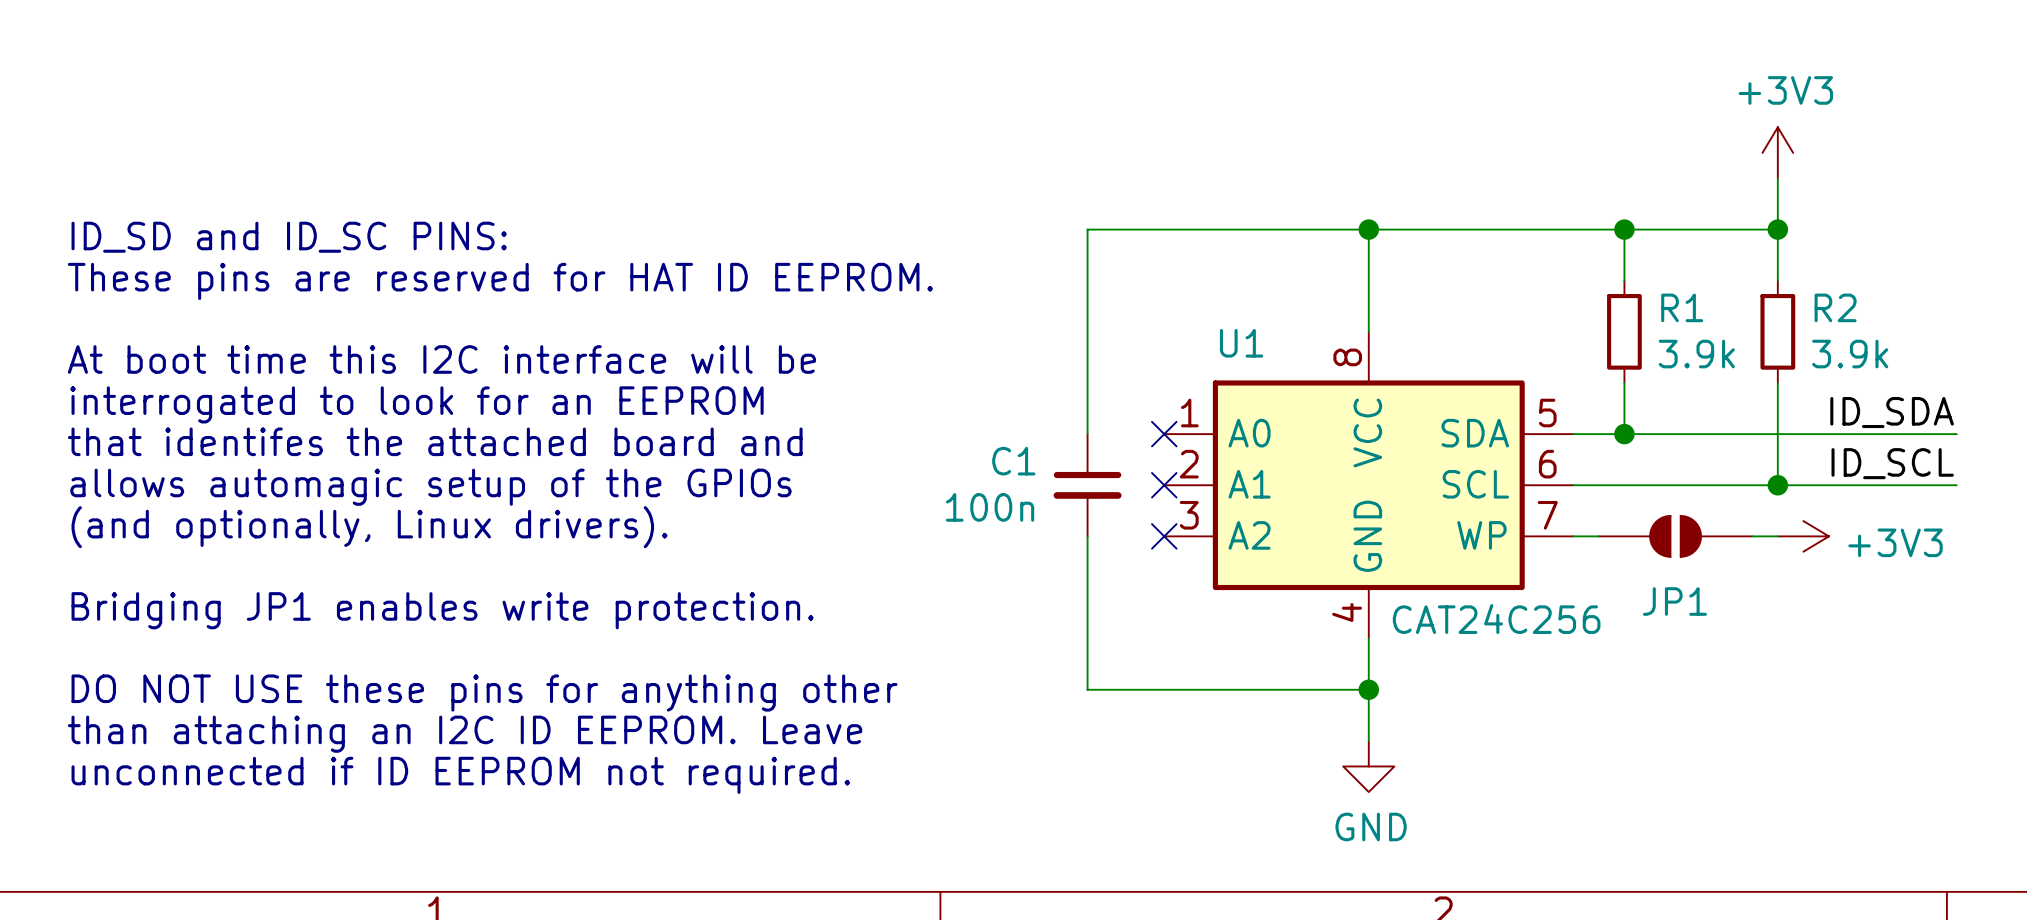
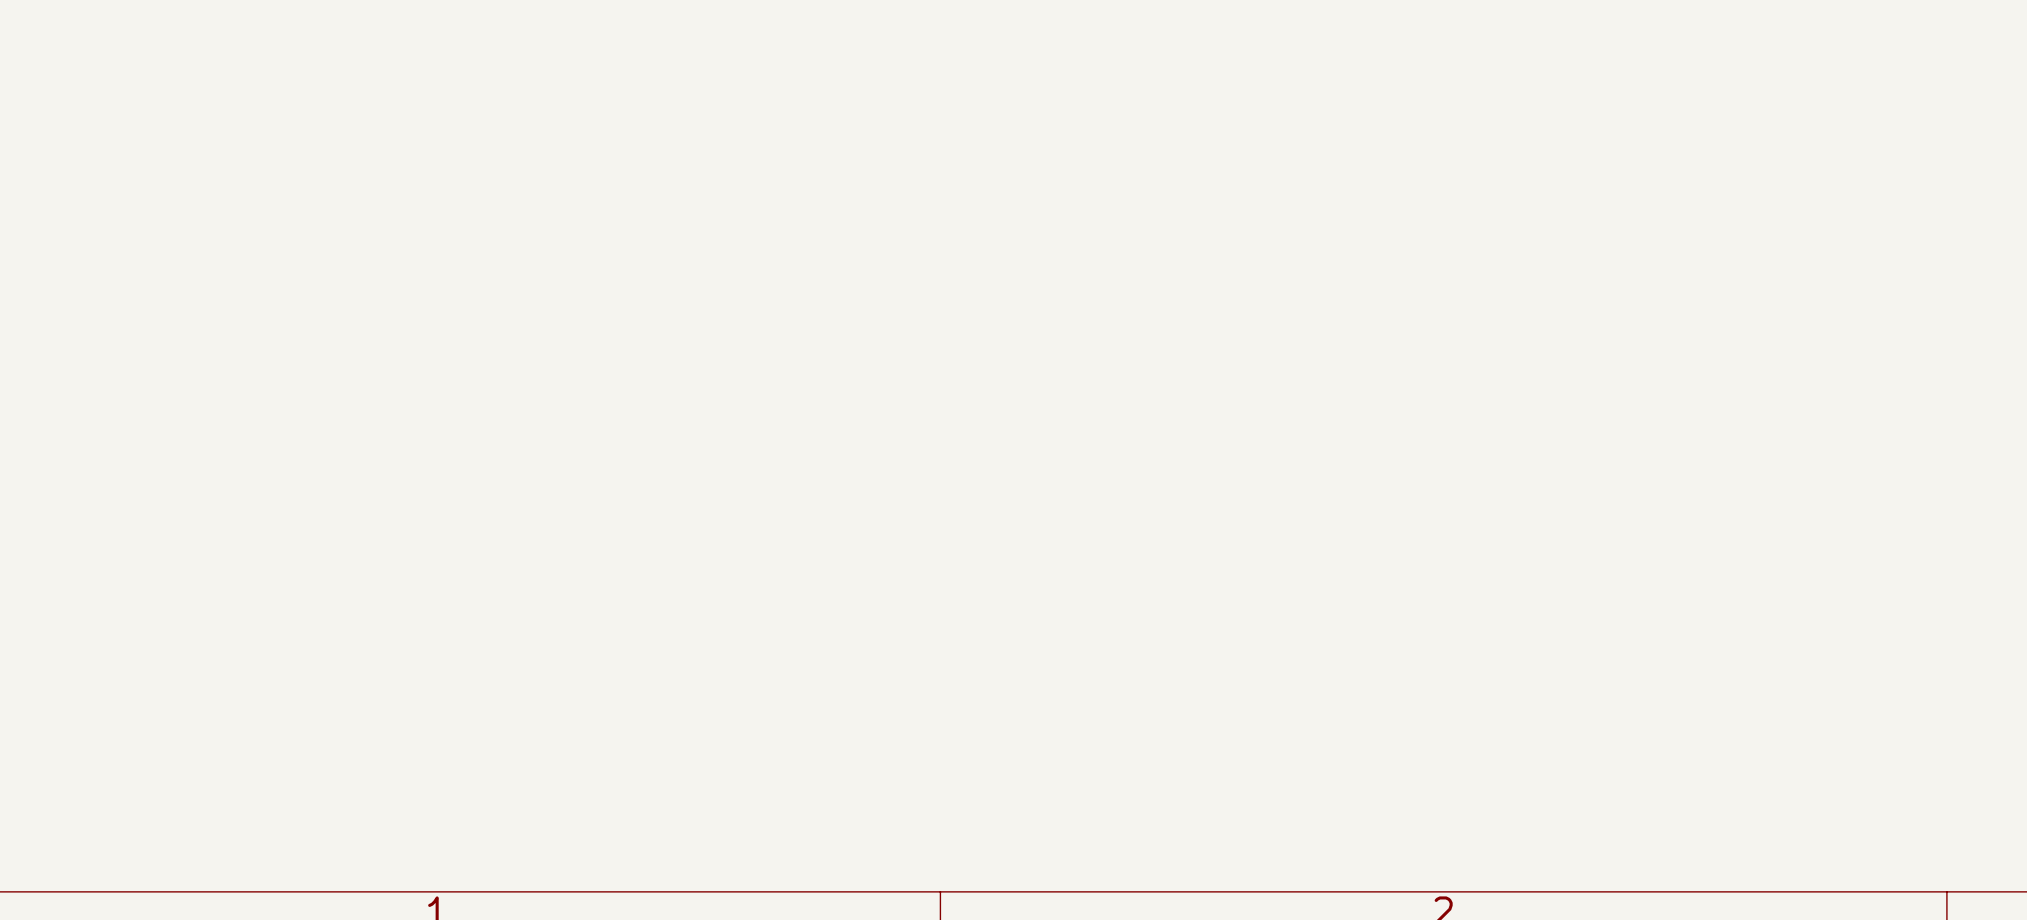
power symbol: +3V3 (1777, 152) -> none
wire: (1777, 178) (1777, 280) -> none
wire: (1368, 229) (1368, 331) -> none
junction: (1368, 229) -> none
wire: (1624, 229) (1624, 280) -> none
junction: (1624, 229) -> none
wire: (1777, 229) (1087, 229) (1087, 434) -> none
junction: (1777, 229) -> none
text: ID_SD and ID_SC PINS: (289, 237) -> none
text: These pins are reserved for HAT ID EEPROM. (500, 281) -> none
R1: 3.9k (1624, 331) -> none
R2: 3.9k (1777, 331) -> none
text: At boot time this I2C interface will be (441, 359) -> none
wire: (1624, 382) (1624, 434) -> none
wire: (1777, 382) (1777, 485) -> none
text: interrogated to look for an EEPROM (416, 404) -> none
label: ID_SDA (1892, 412) -> none
no-connect mark: (1164, 434) -> none
wire: (1573, 434) (1956, 434) -> none
junction: (1624, 434) -> none
text: that identifes the attached board and (435, 441) -> none
label: ID_SCL (1892, 463) -> none
C1: 100n (1087, 485) -> none
no-connect mark: (1164, 485) -> none
U1: CAT24C256 (1368, 485) -> none
wire: (1573, 485) (1956, 485) -> none
junction: (1777, 485) -> none
text: allows automagic setup of the GPIOs (430, 487) -> none
text: (and optionally, Linux drivers). (369, 527) -> none
wire: (1087, 536) (1087, 689) (1368, 689) -> none
no-connect mark: (1164, 536) -> none
wire: (1573, 536) (1598, 536) -> none
JP1: (1675, 536) -> none
wire: (1752, 536) (1777, 536) -> none
power symbol: +3V3 (1803, 536) -> none
text: Bridging JP1 enables write protection. (442, 610) -> none
wire: (1368, 638) (1368, 740) -> none
junction: (1368, 689) -> none
text: DO NOT USE these pins for anything other (484, 693) -> none
text: than attaching an I2C ID EEPROM. Leave (465, 734) -> none
power symbol: GND (1368, 766) -> none
text: unconnected if ID EEPROM not required. (460, 775) -> none

